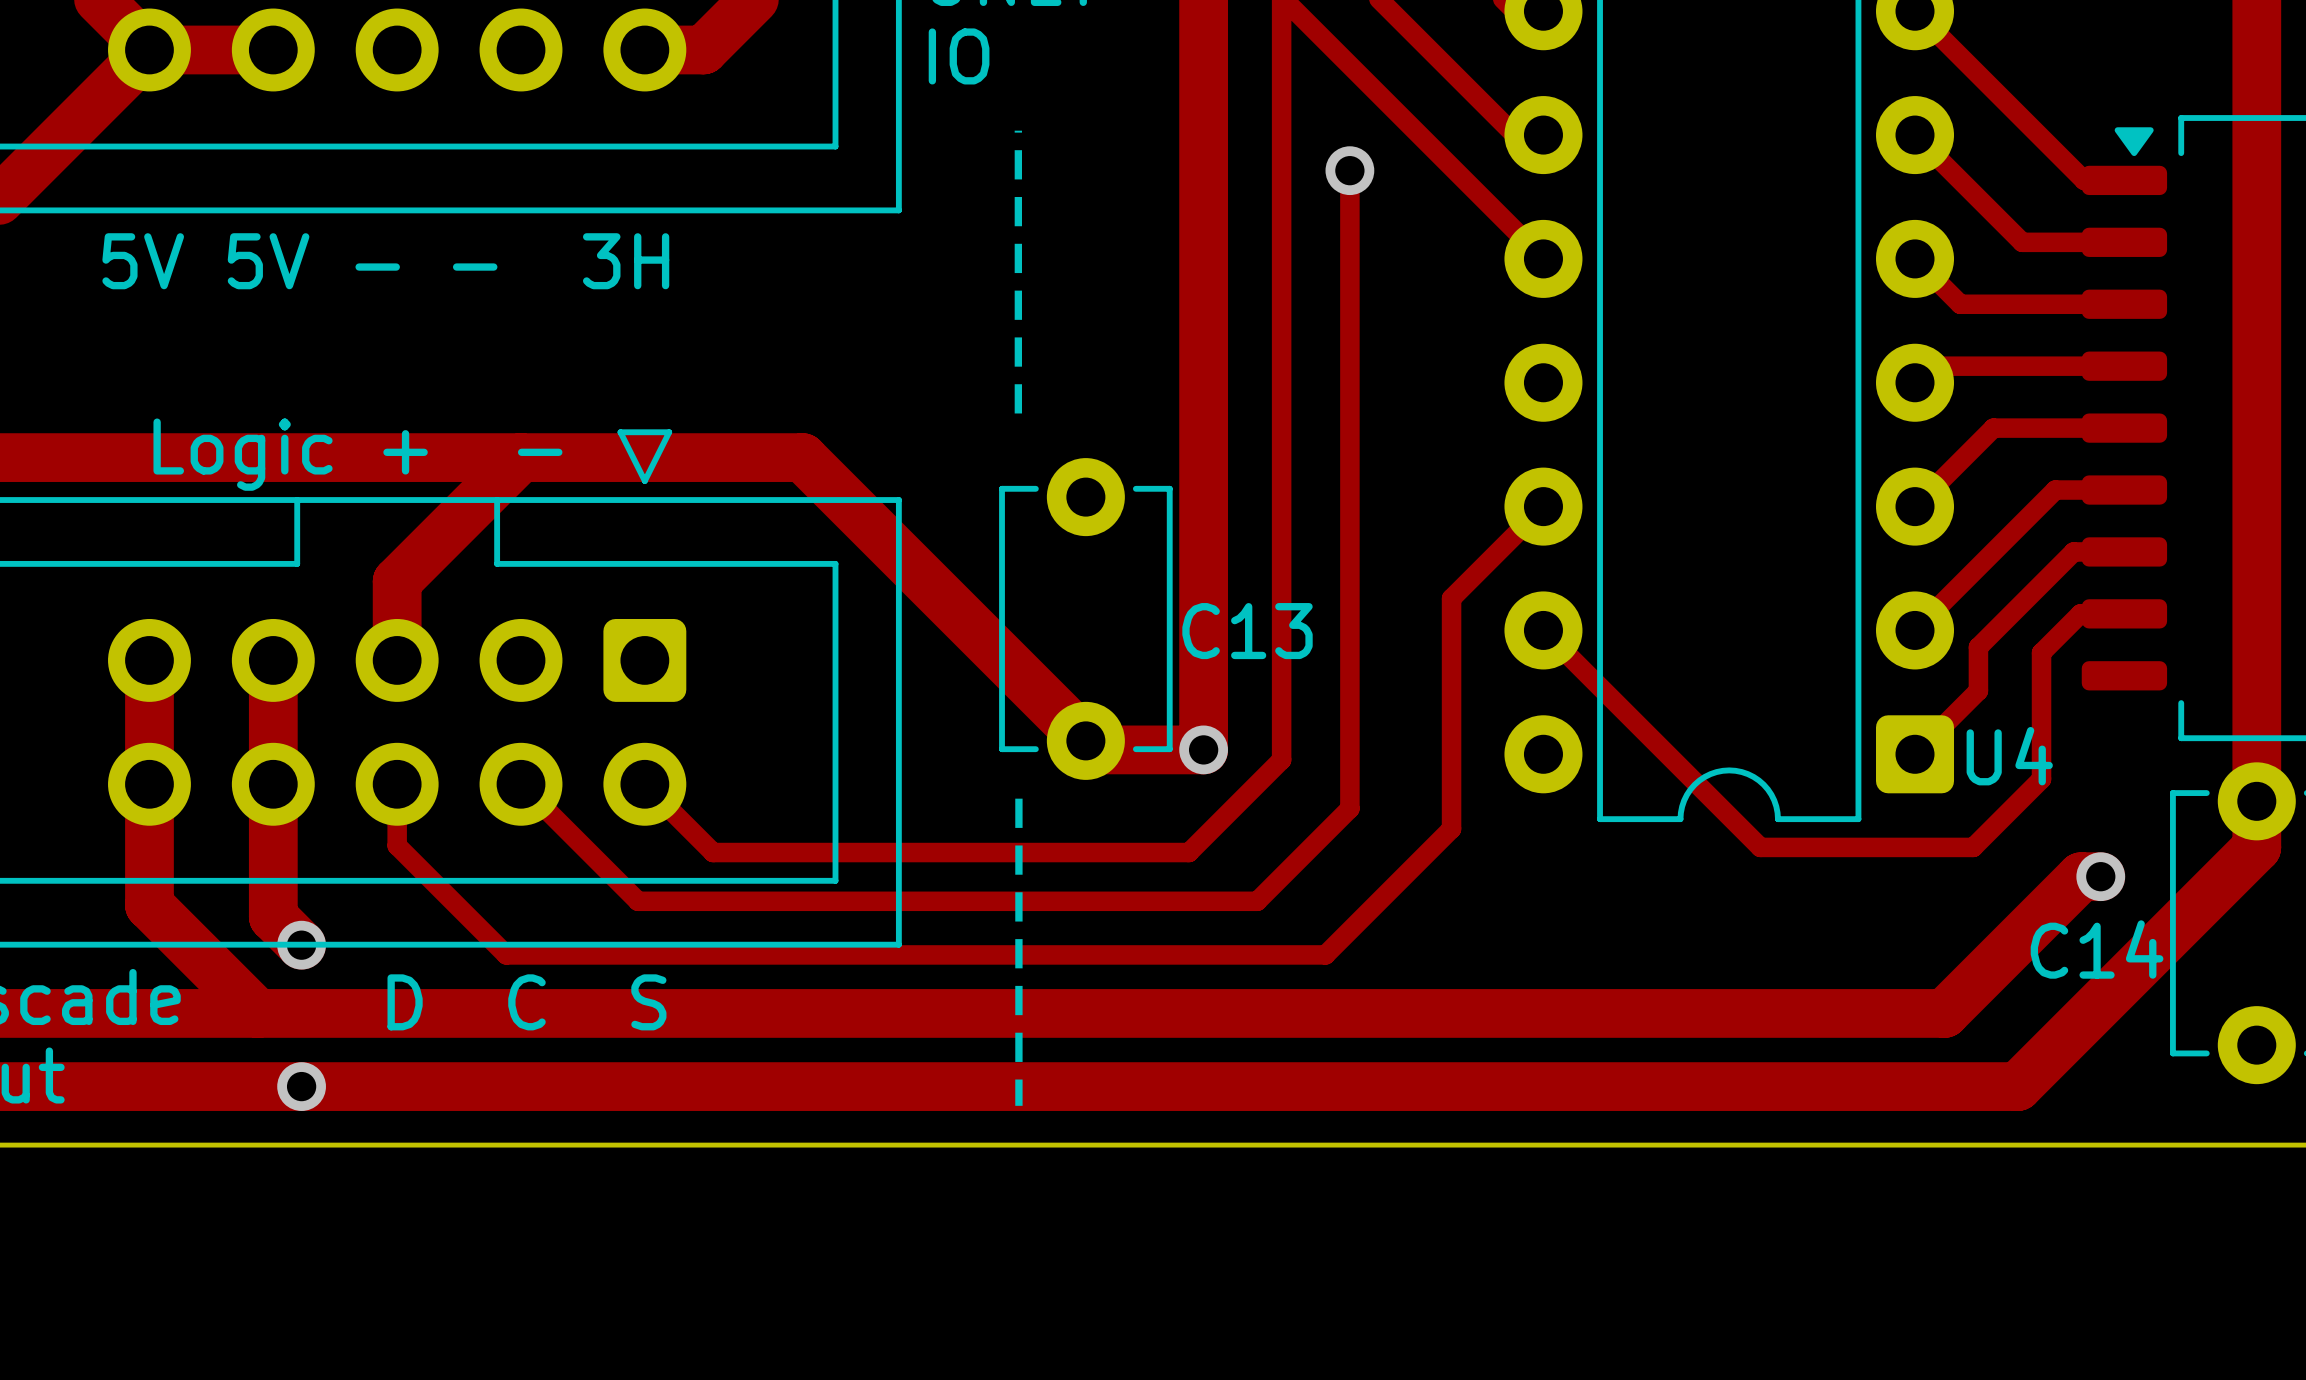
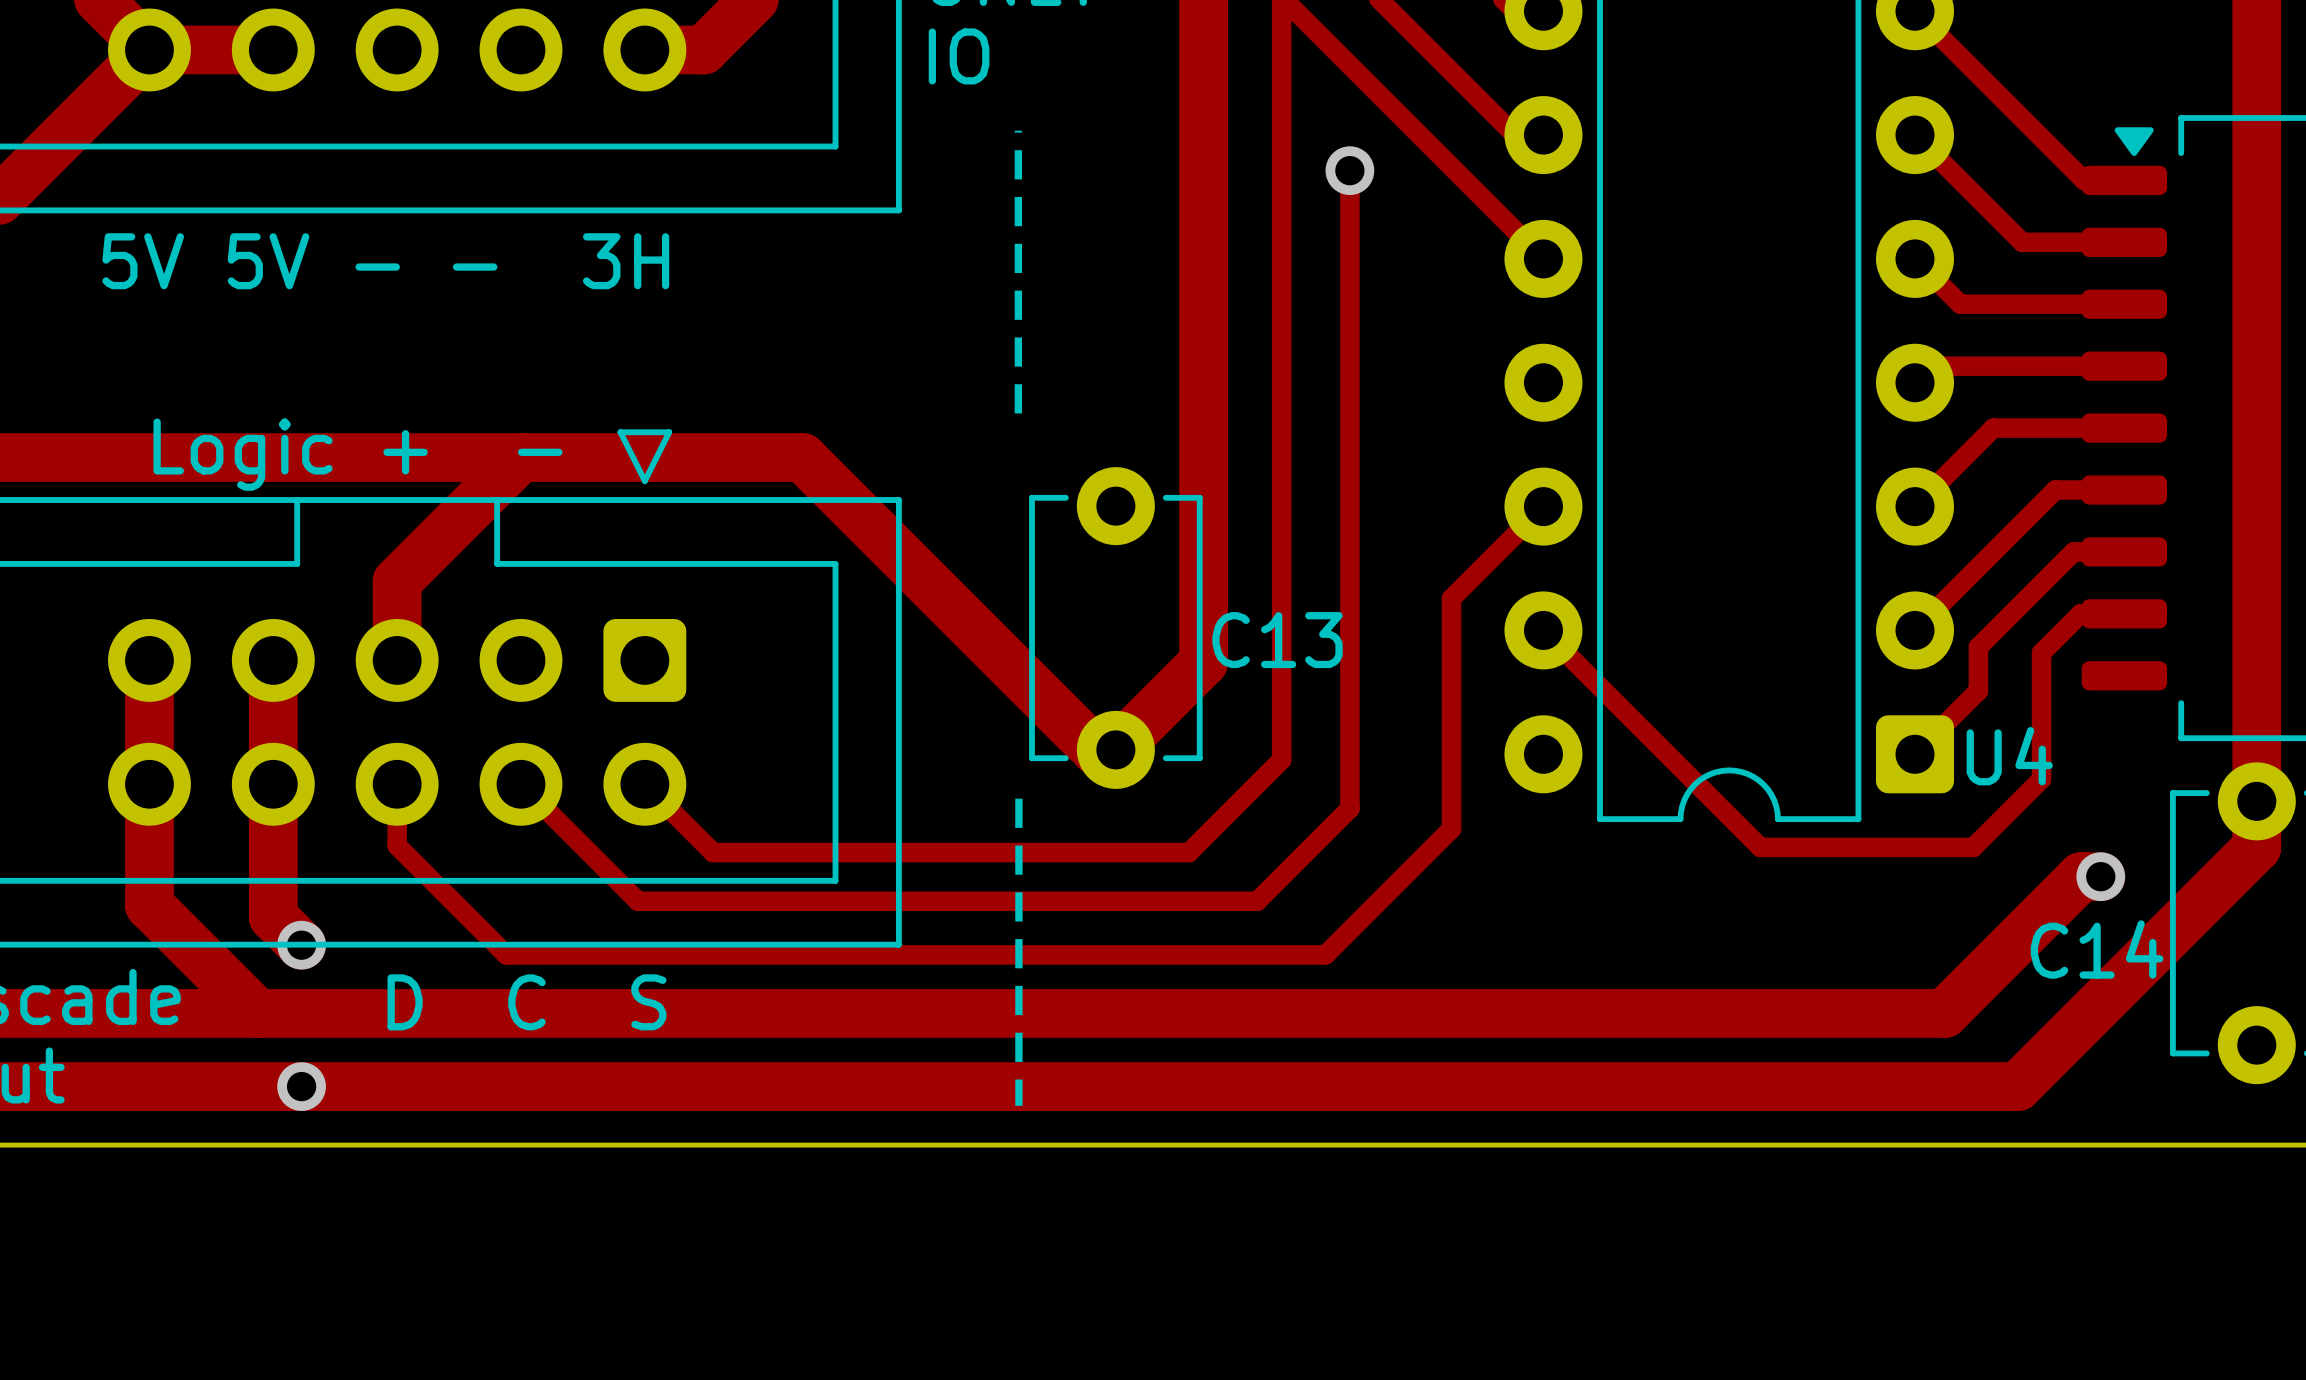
C13 position: (1085, 618) -> (1115, 628)
track: (1203, 662) (1203, 749) (1115, 749) -> (1203, 662) (1115, 749)
via: (1203, 749) -> none

